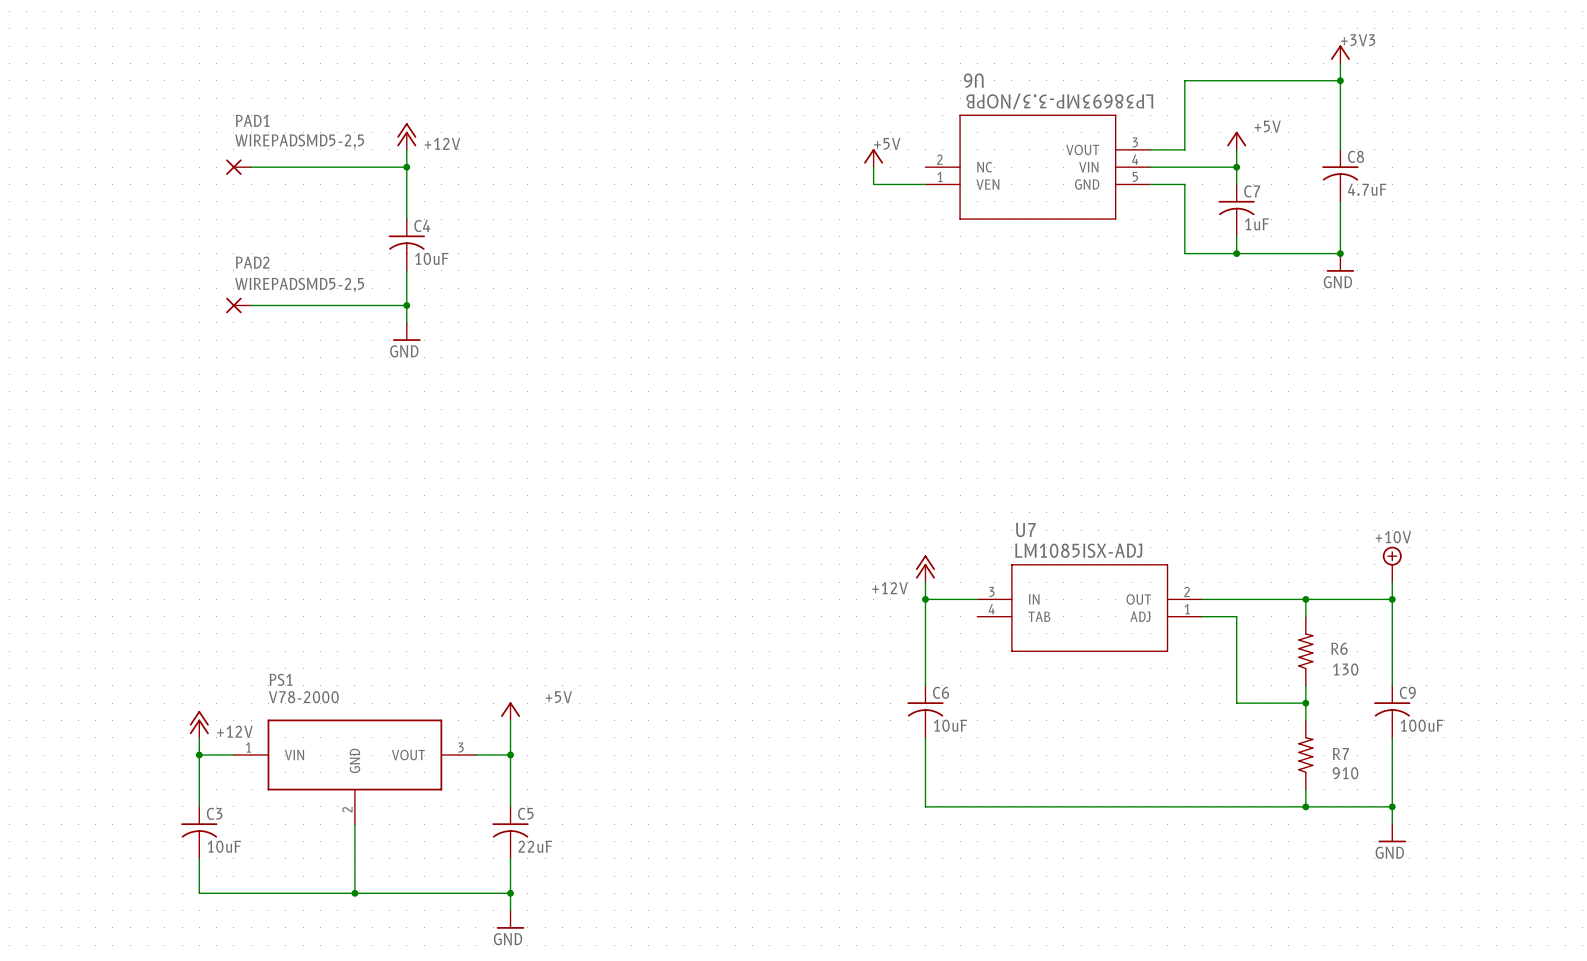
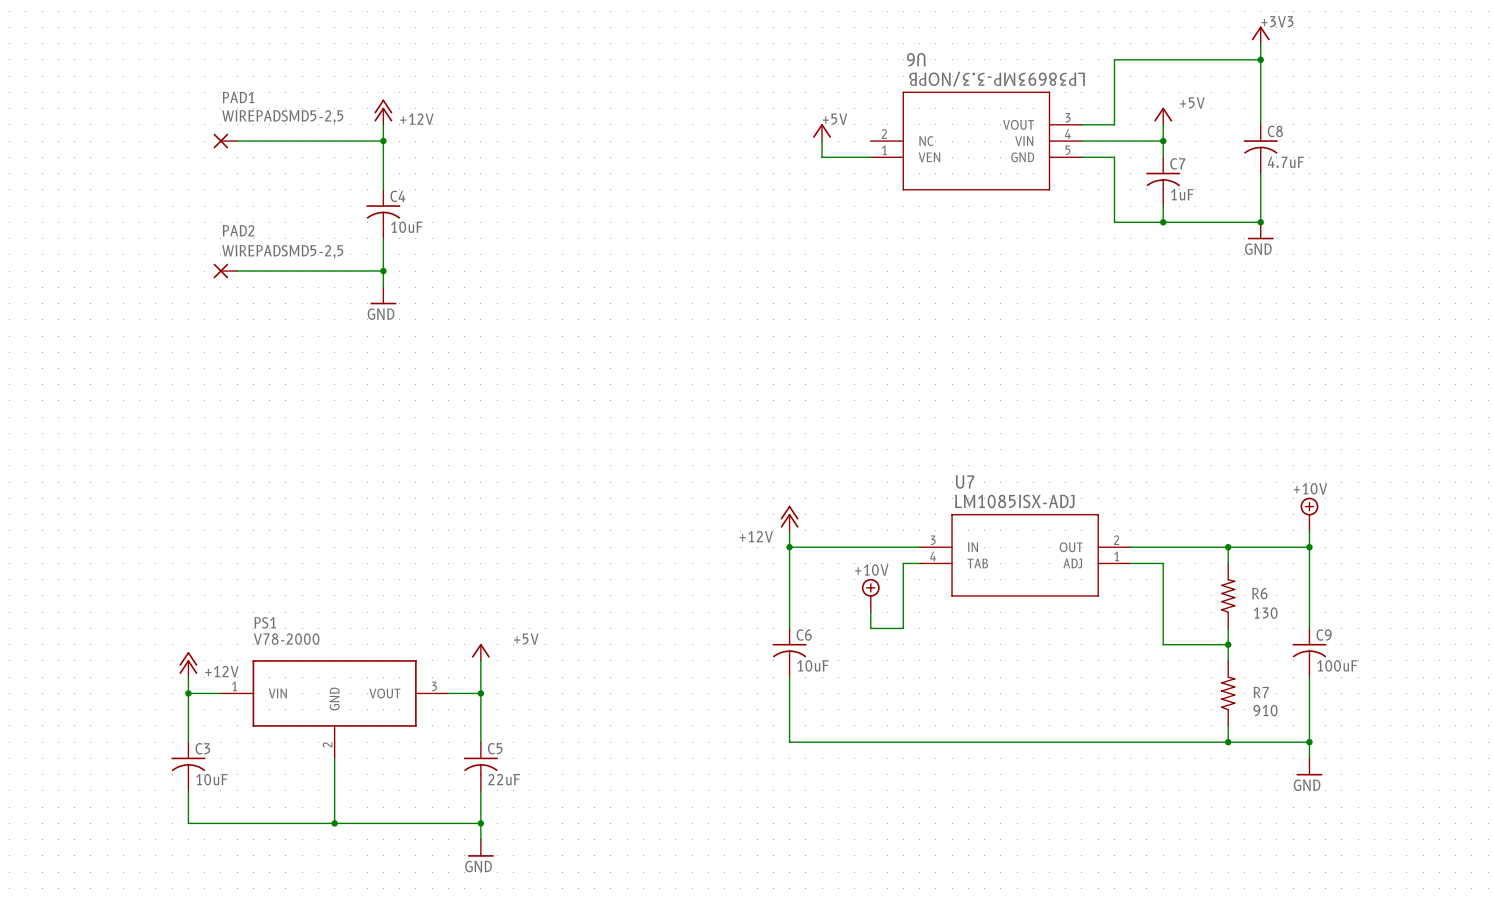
power symbol position: +12V (925, 568) -> +12V (789, 518)
wire: none -> (789, 530) (789, 628)
wire: (925, 582) (925, 668) -> none
wire: none -> (789, 547) (870, 547)
junction: none -> (789, 547)
junction: (925, 599) -> none
wire: none -> (919, 563) (903, 563) (903, 628) (870, 628)
power symbol: none -> +10V (870, 595)
C6 position: (925, 711) -> (789, 652)
wire: (925, 737) (925, 806) -> (789, 677) (789, 742) (870, 742)

